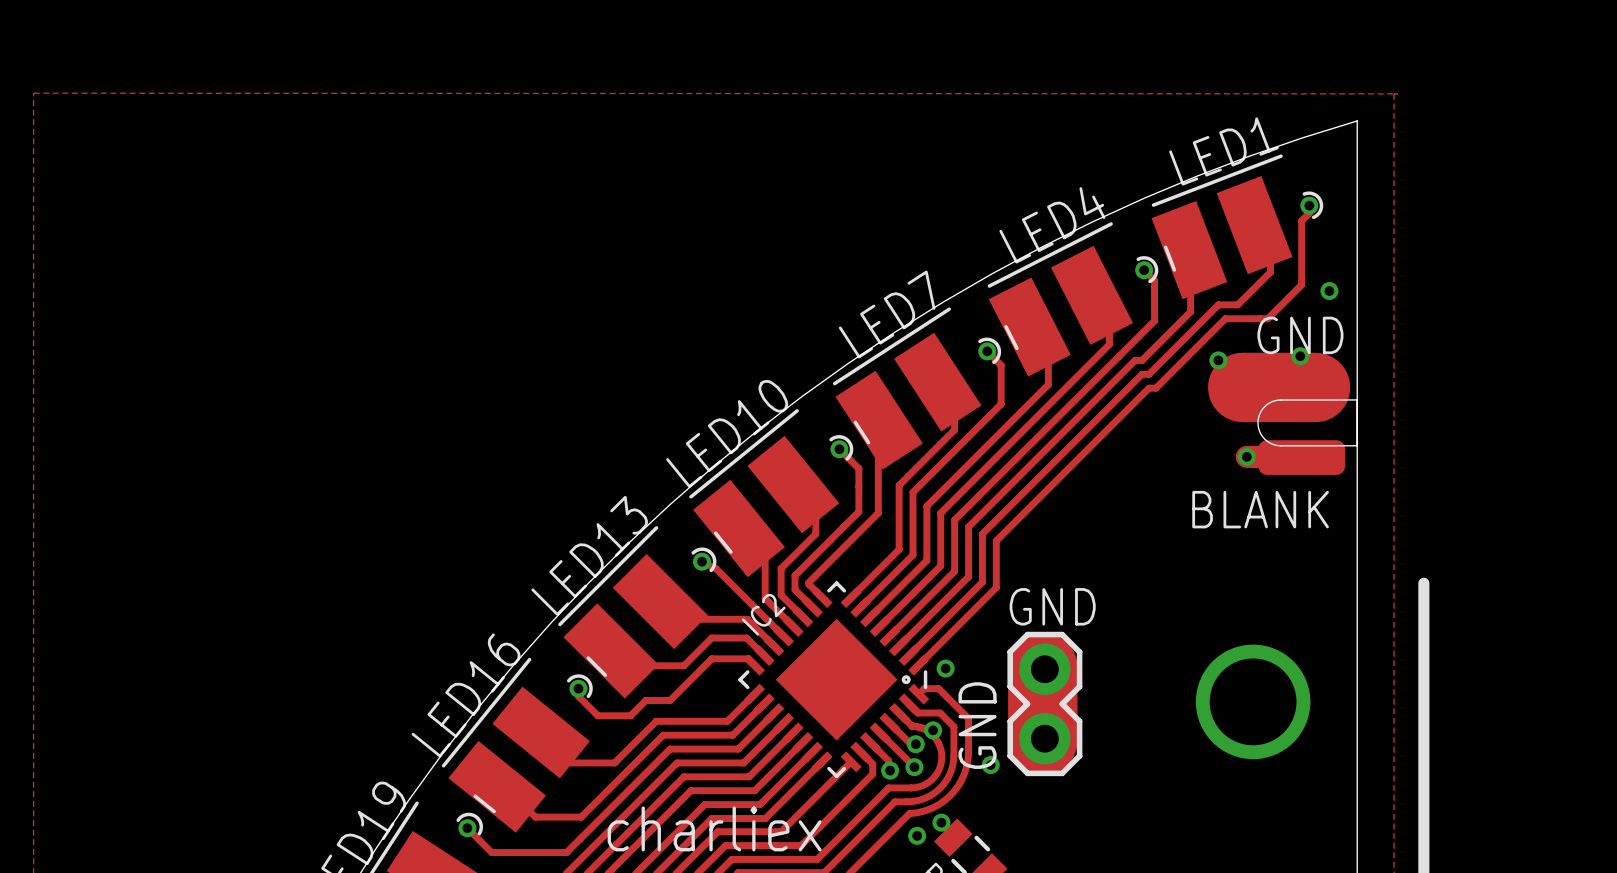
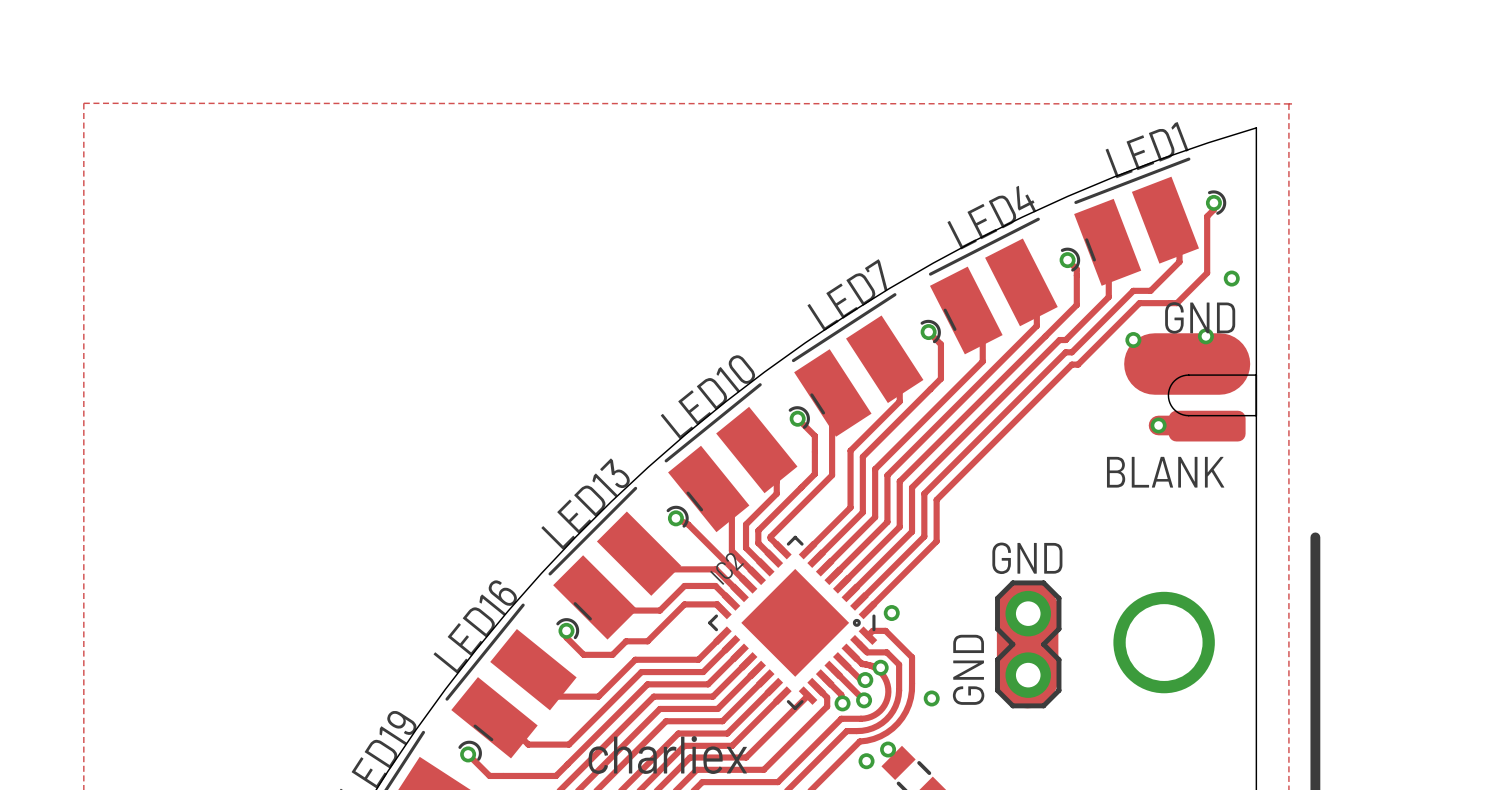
text position: GND (1052, 606) -> GND (1027, 558)
track: (1044, 669) (1042, 667) (1042, 740) -> none
track: none -> (1028, 613) (1027, 677)
GND position: (1044, 703) -> (1028, 644)

